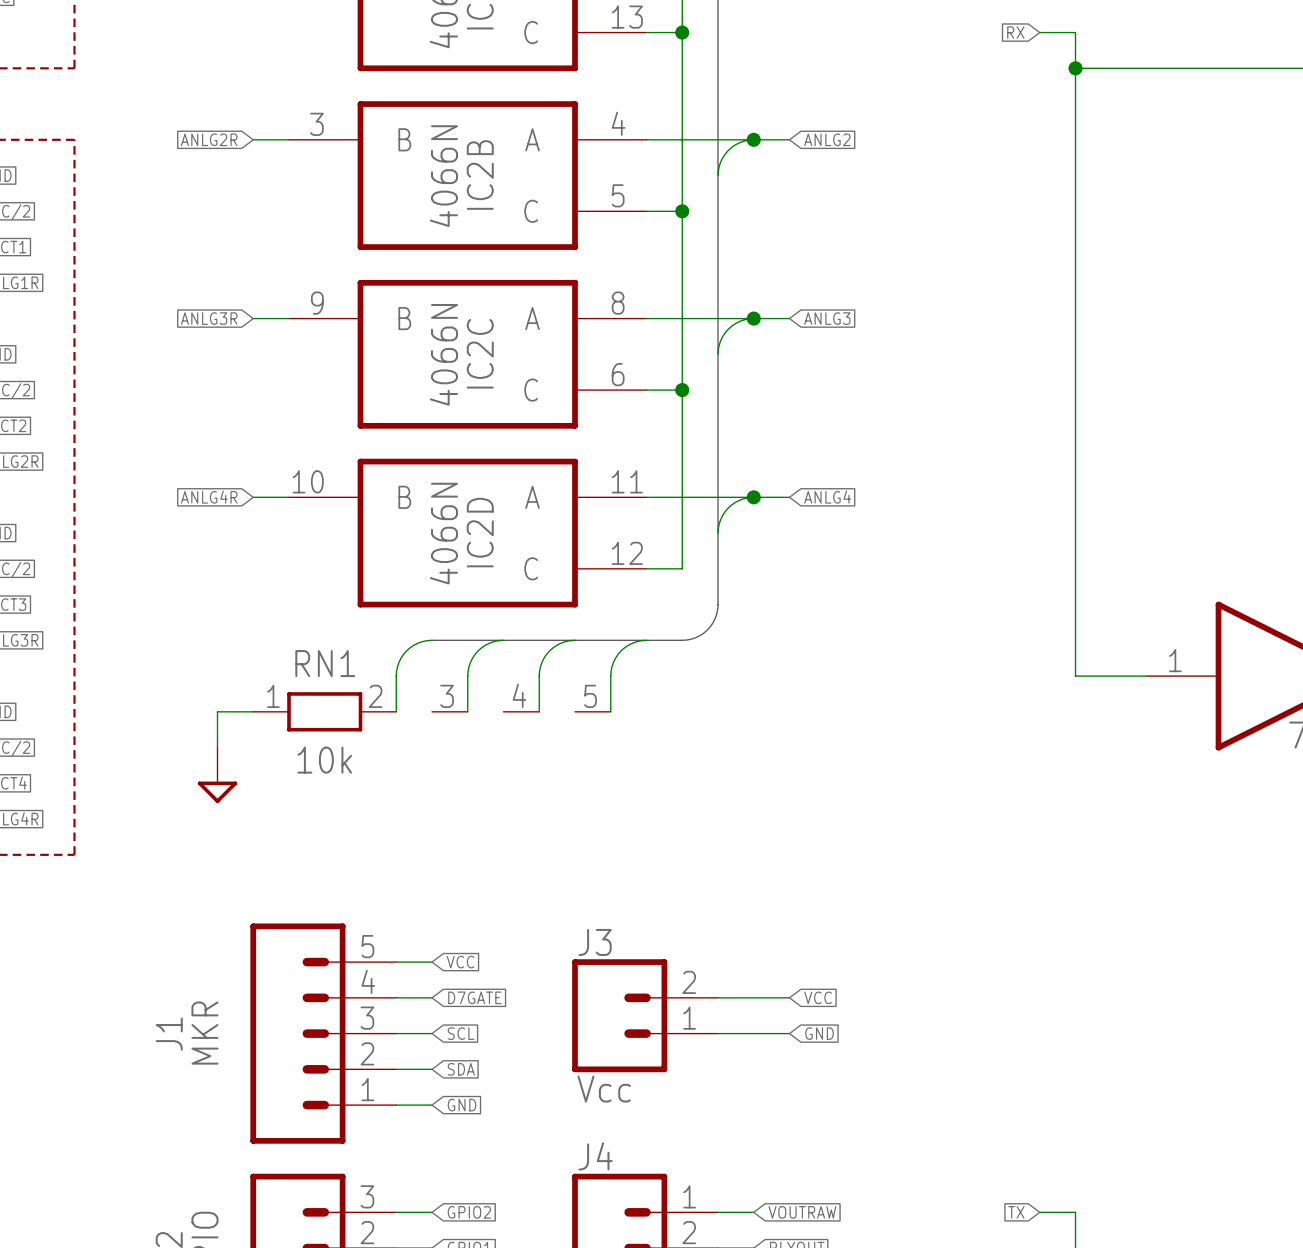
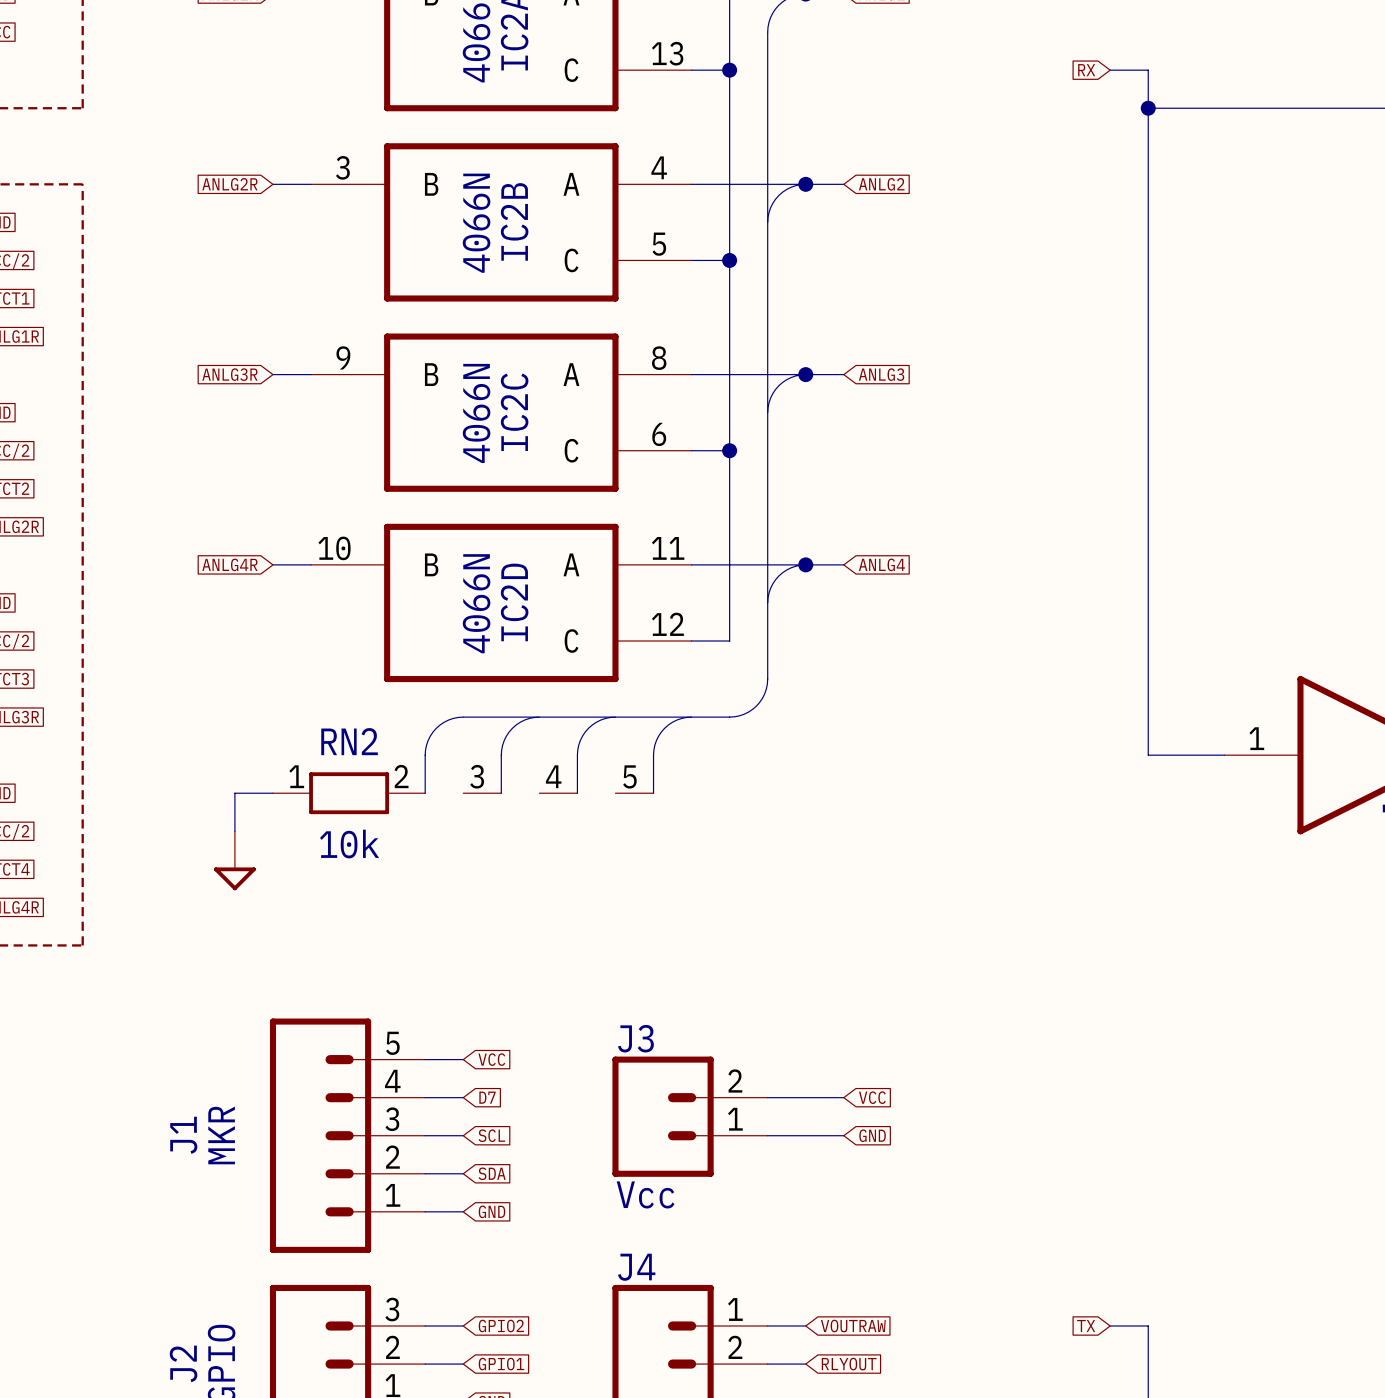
RN1 name: RN1 (325, 663) -> RN2 (349, 741)
global label: D7GATE (474, 997) -> D7 (487, 1097)

